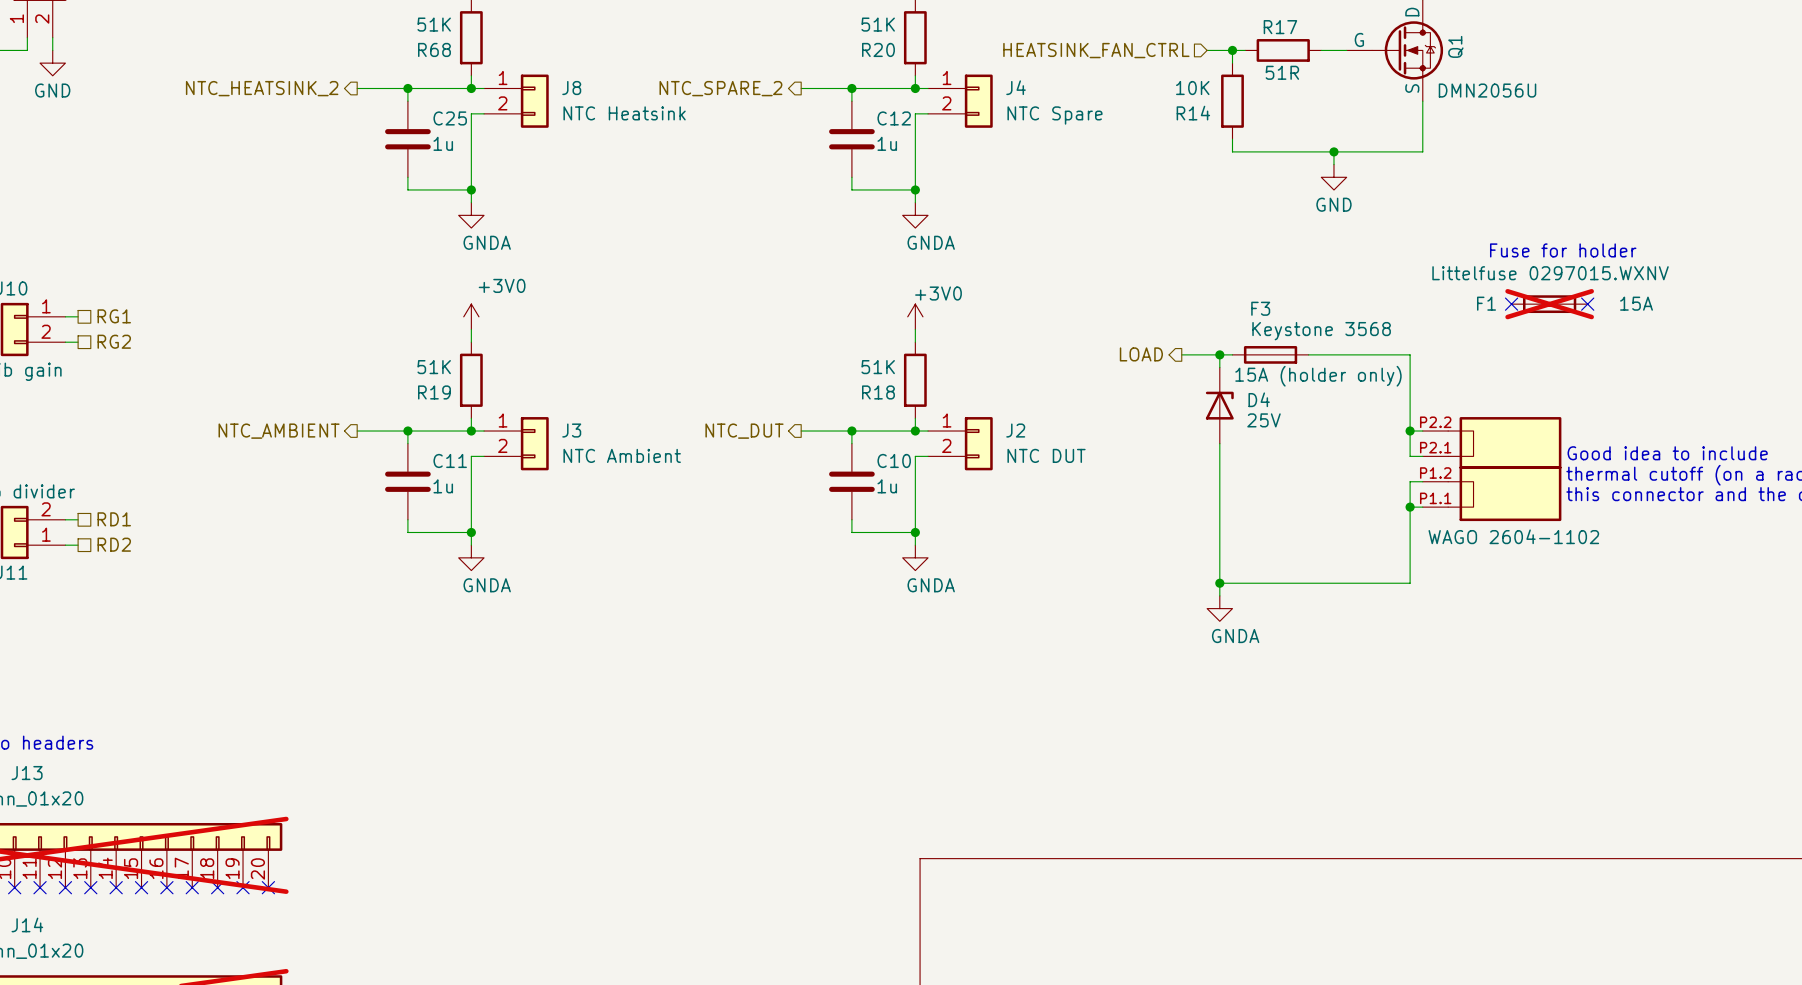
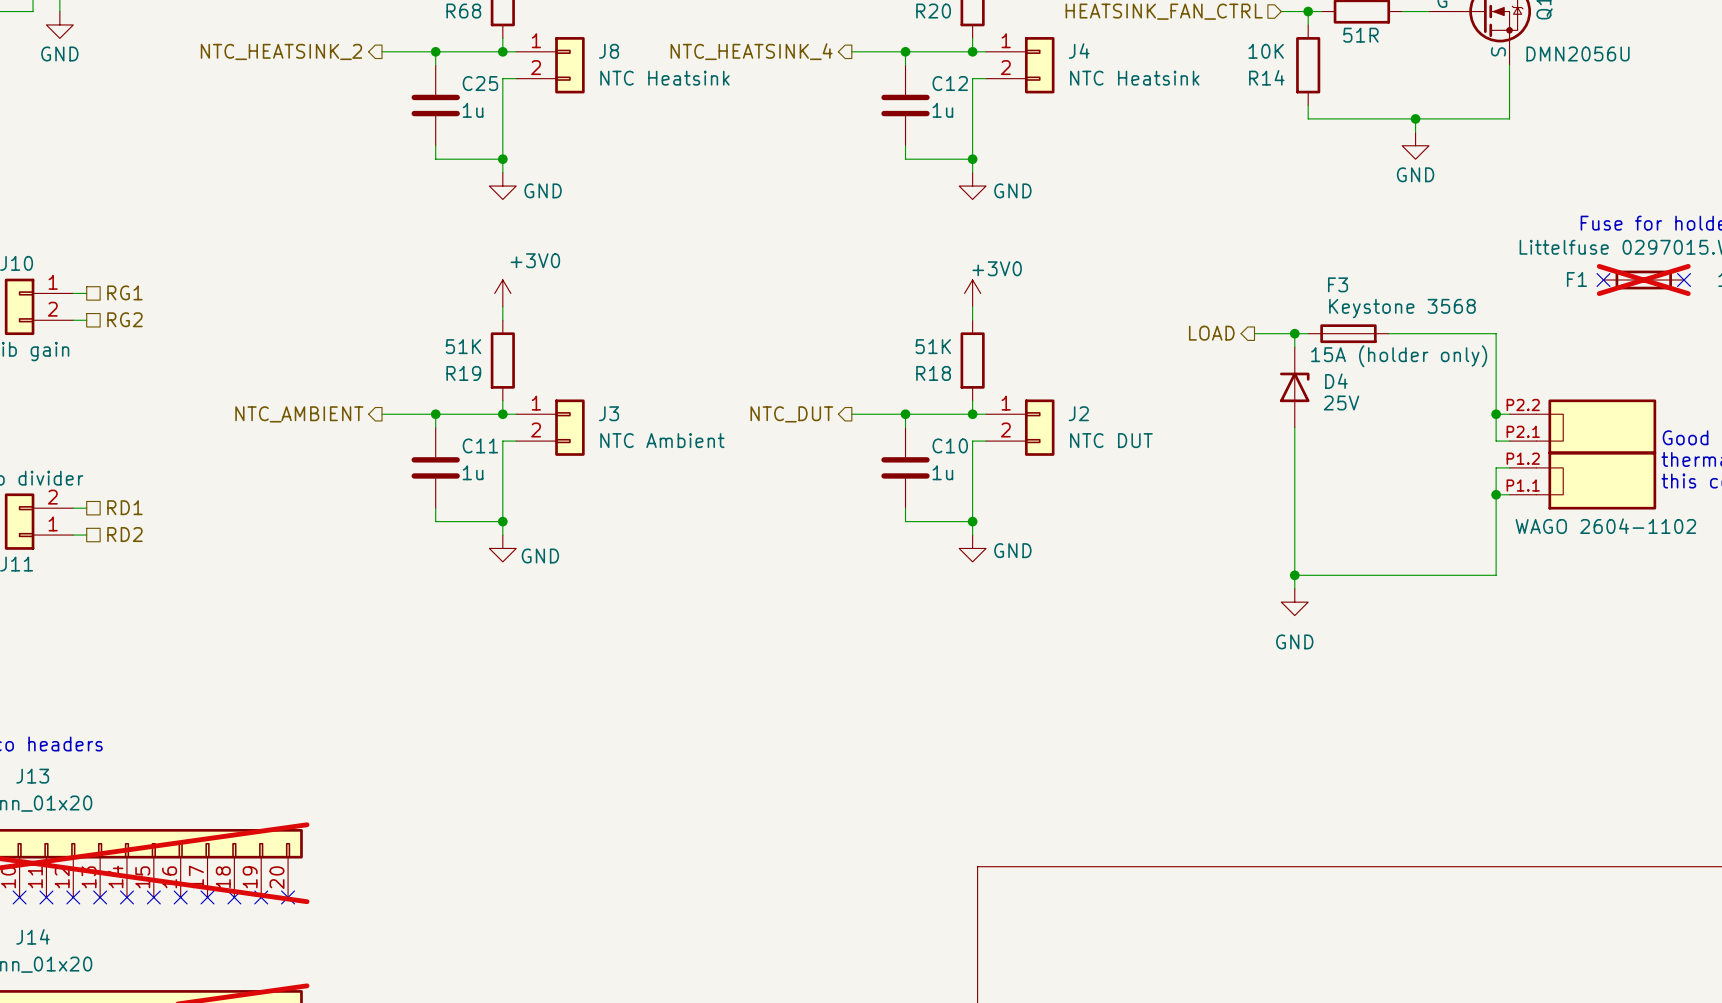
hierarchical label: NTC_SPARE_2 (720, 88) -> NTC_HEATSINK_4 (751, 51)
J4 value: NTC Spare (1054, 115) -> NTC Heatsink (1134, 78)
power symbol: GNDA (471, 215) -> GND (502, 186)
power symbol: GNDA (915, 215) -> GND (972, 186)
power symbol: GNDA (471, 557) -> GND (502, 548)
power symbol: GNDA (915, 557) -> GND (972, 548)
power symbol: GNDA (1219, 608) -> GND (1294, 602)

